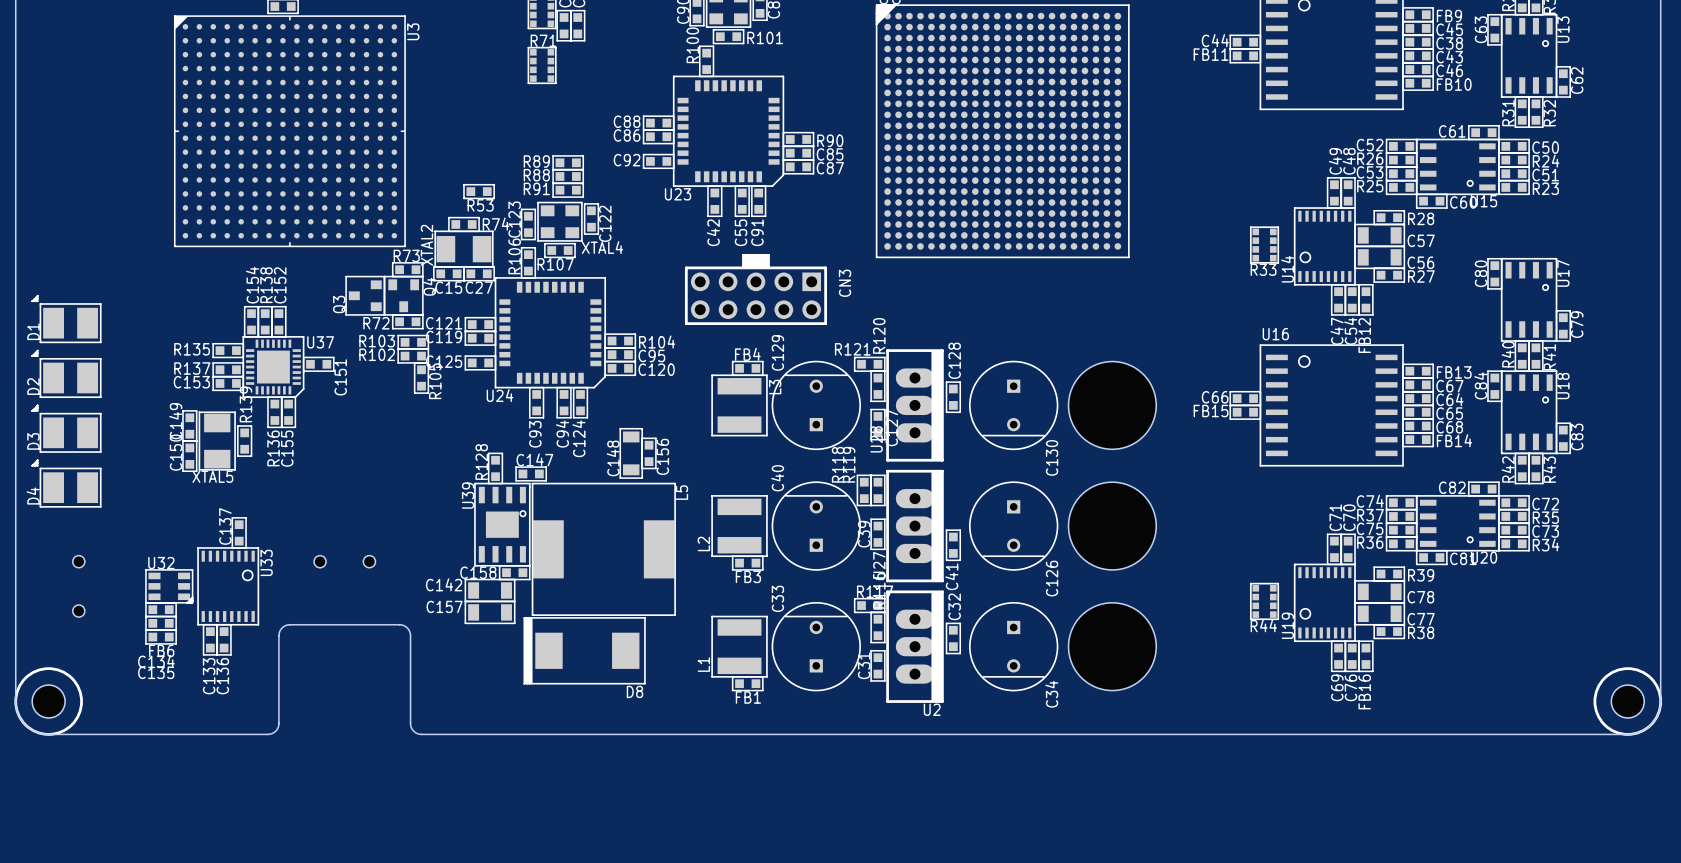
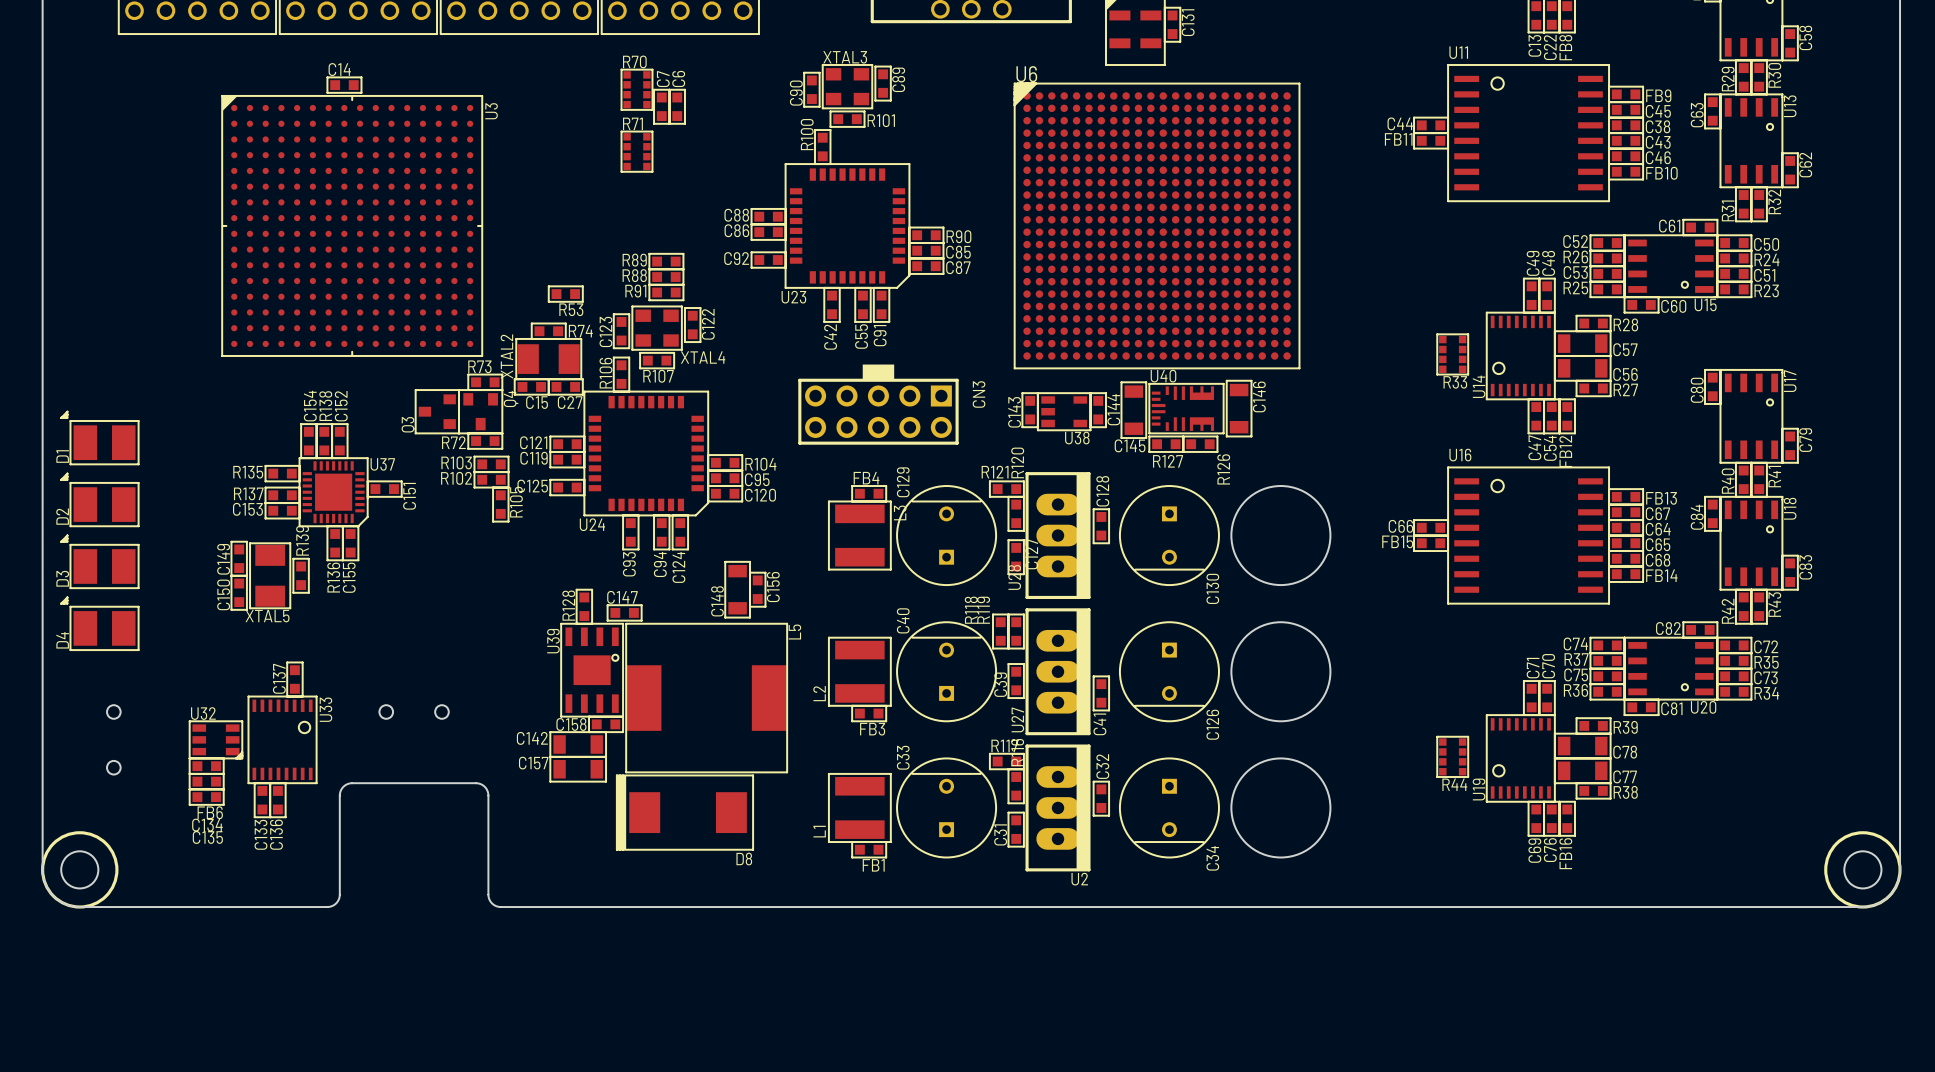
U40: none -> (1186, 408)
C146: none -> (1239, 408)
C143: none -> (1030, 410)
C144: none -> (1098, 410)
C145: none -> (1133, 410)
U38: none -> (1064, 411)
R127: none -> (1166, 444)
R126: none -> (1200, 444)

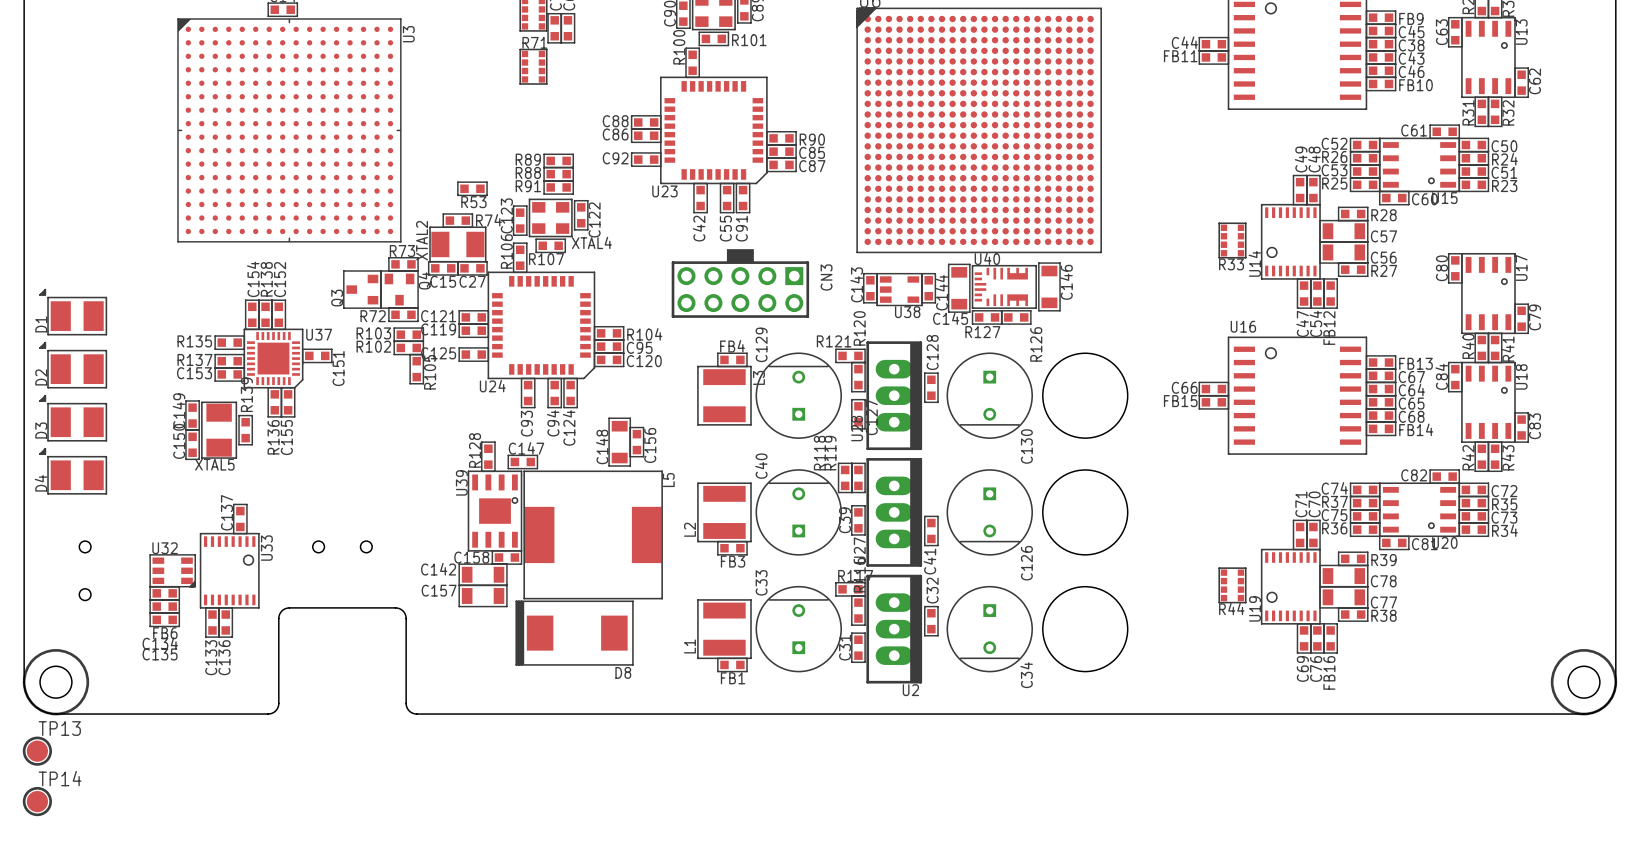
TP13: none -> (37, 751)
TP14: none -> (37, 801)

